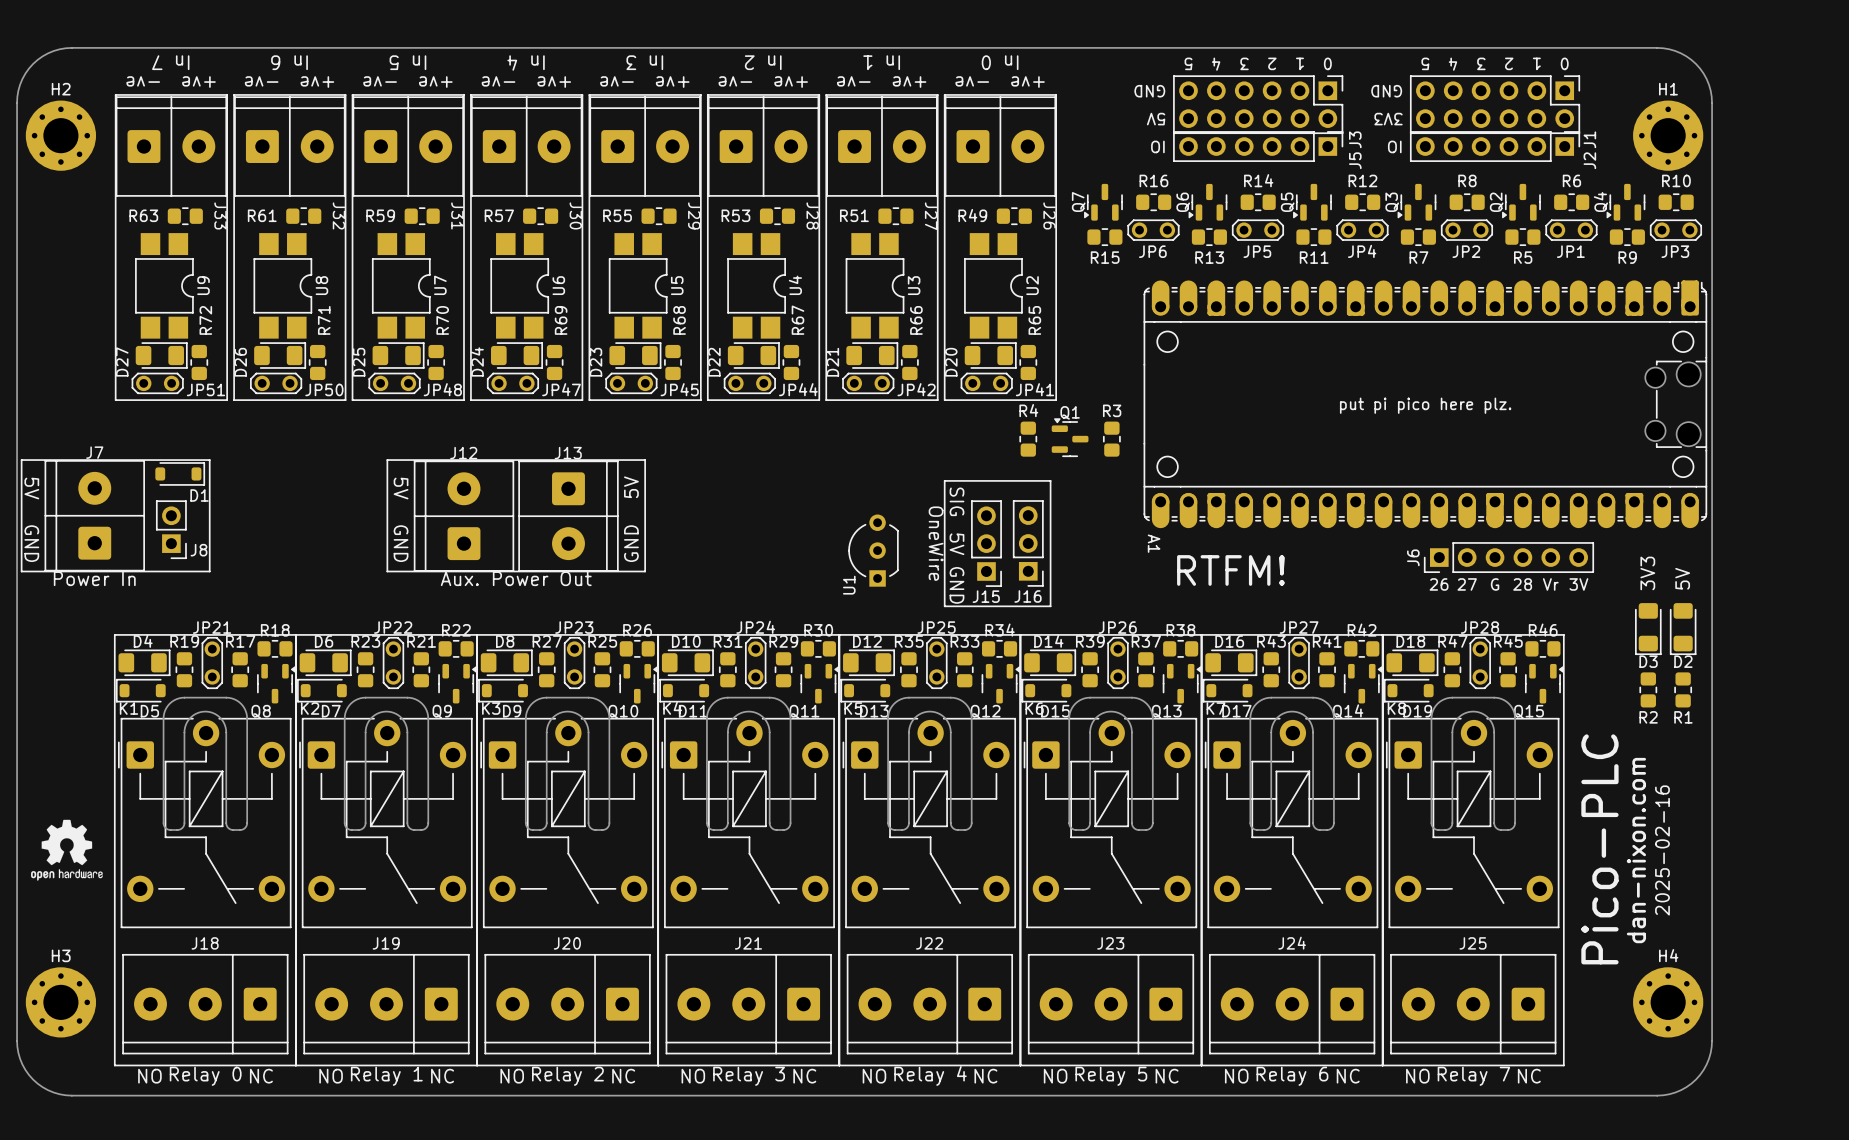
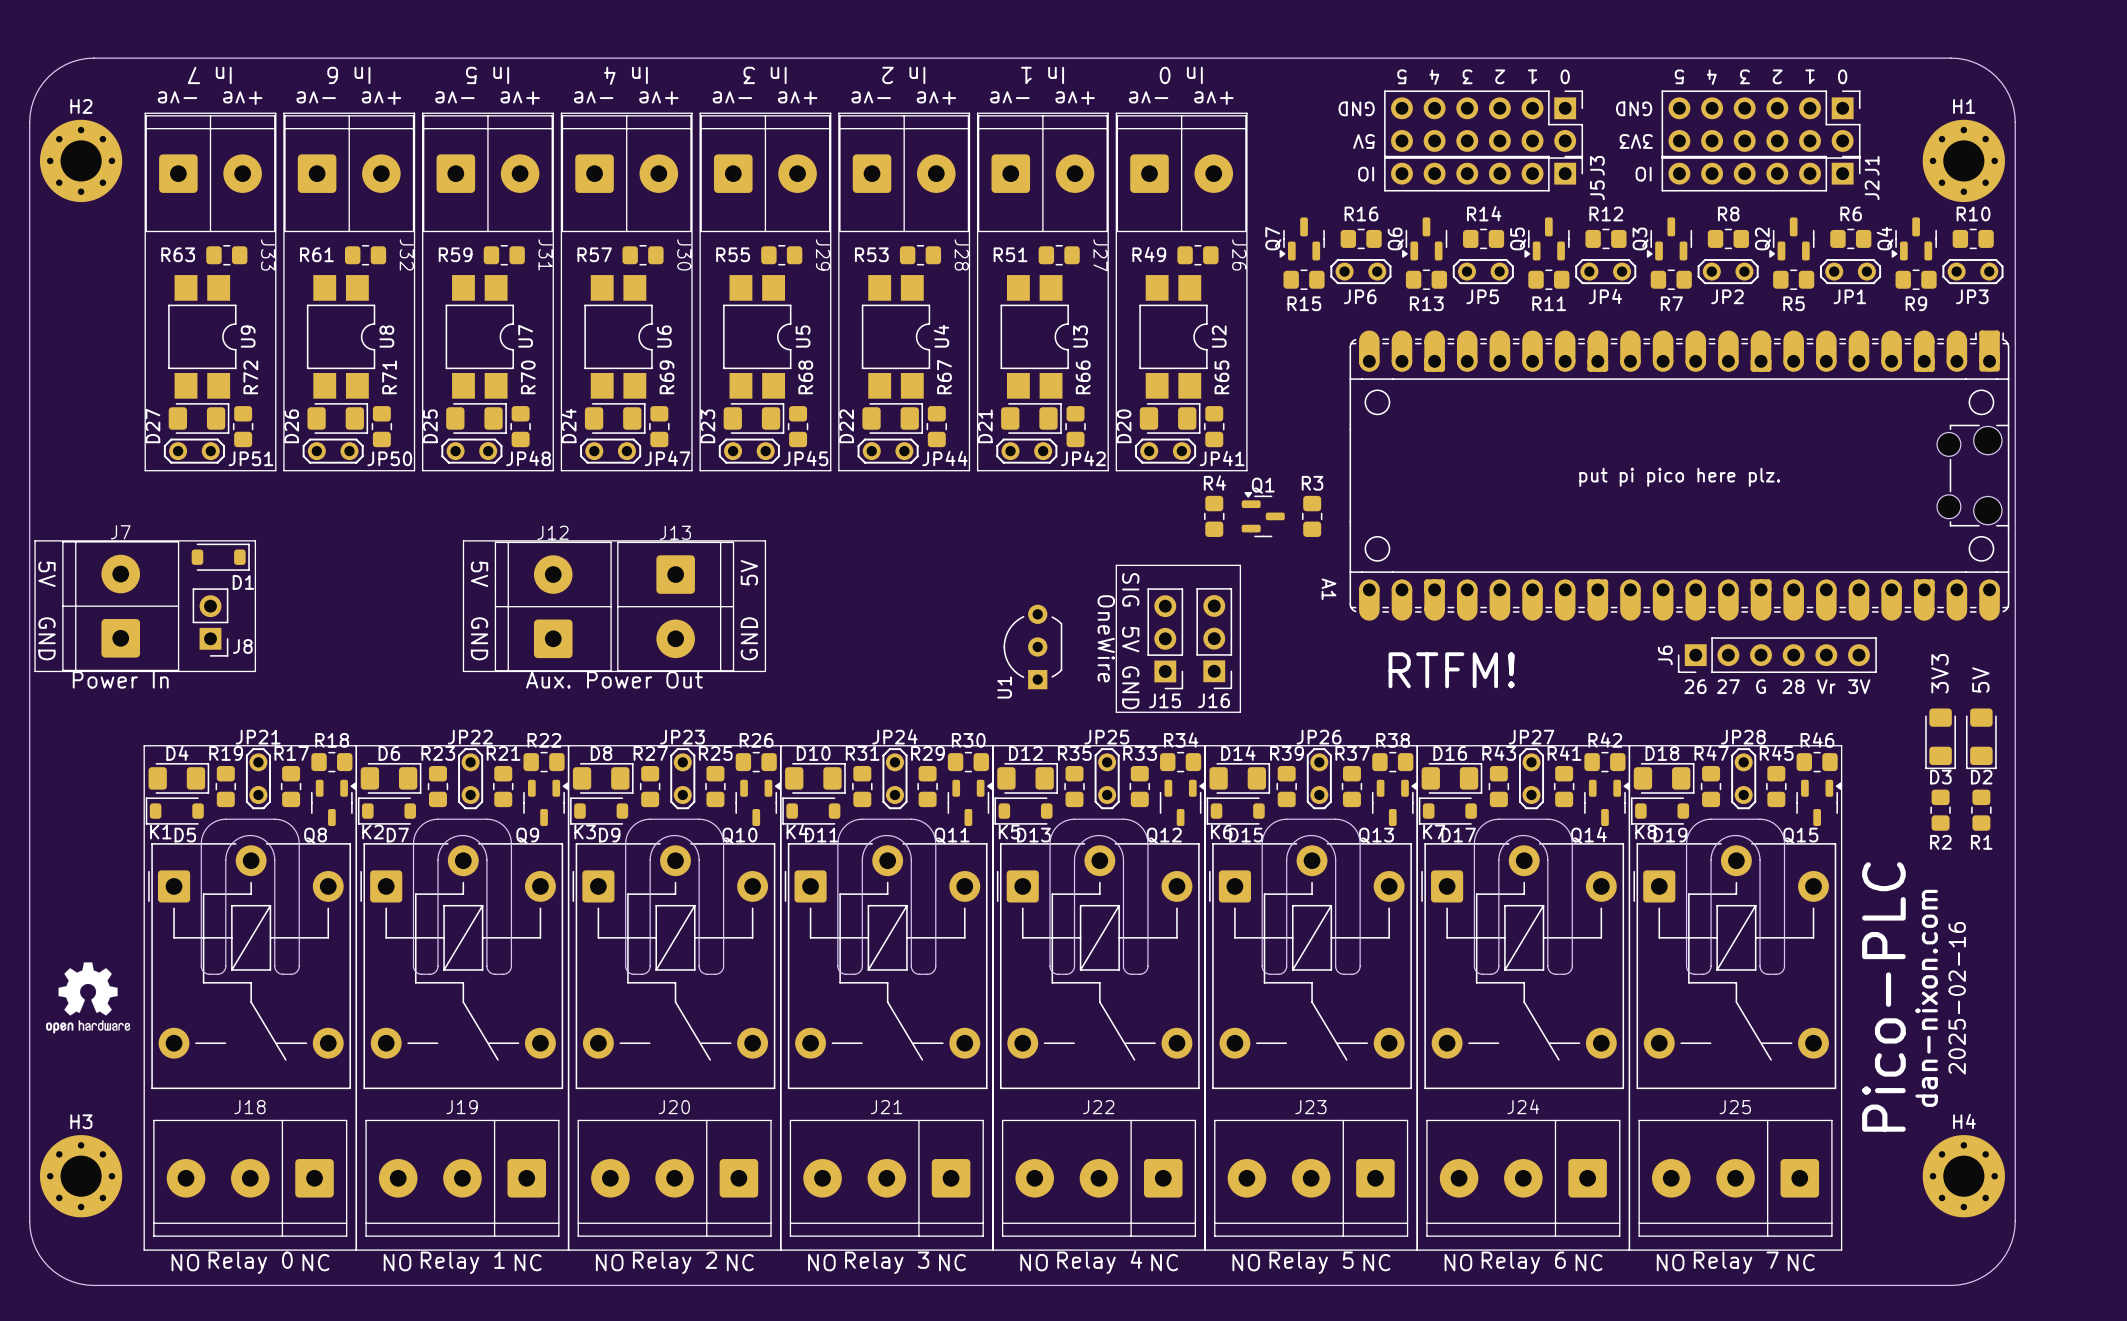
A1 name position: A1 (1154, 543) -> A1 (1329, 589)

